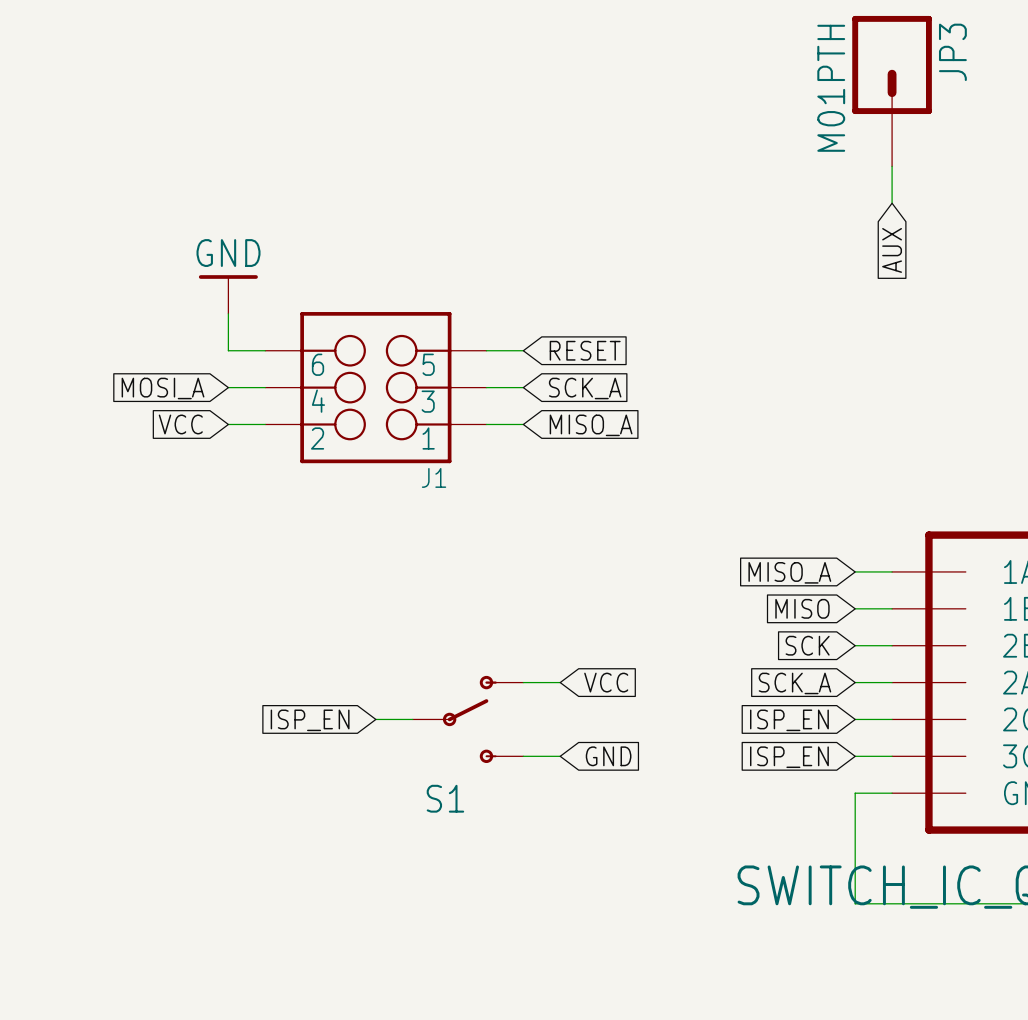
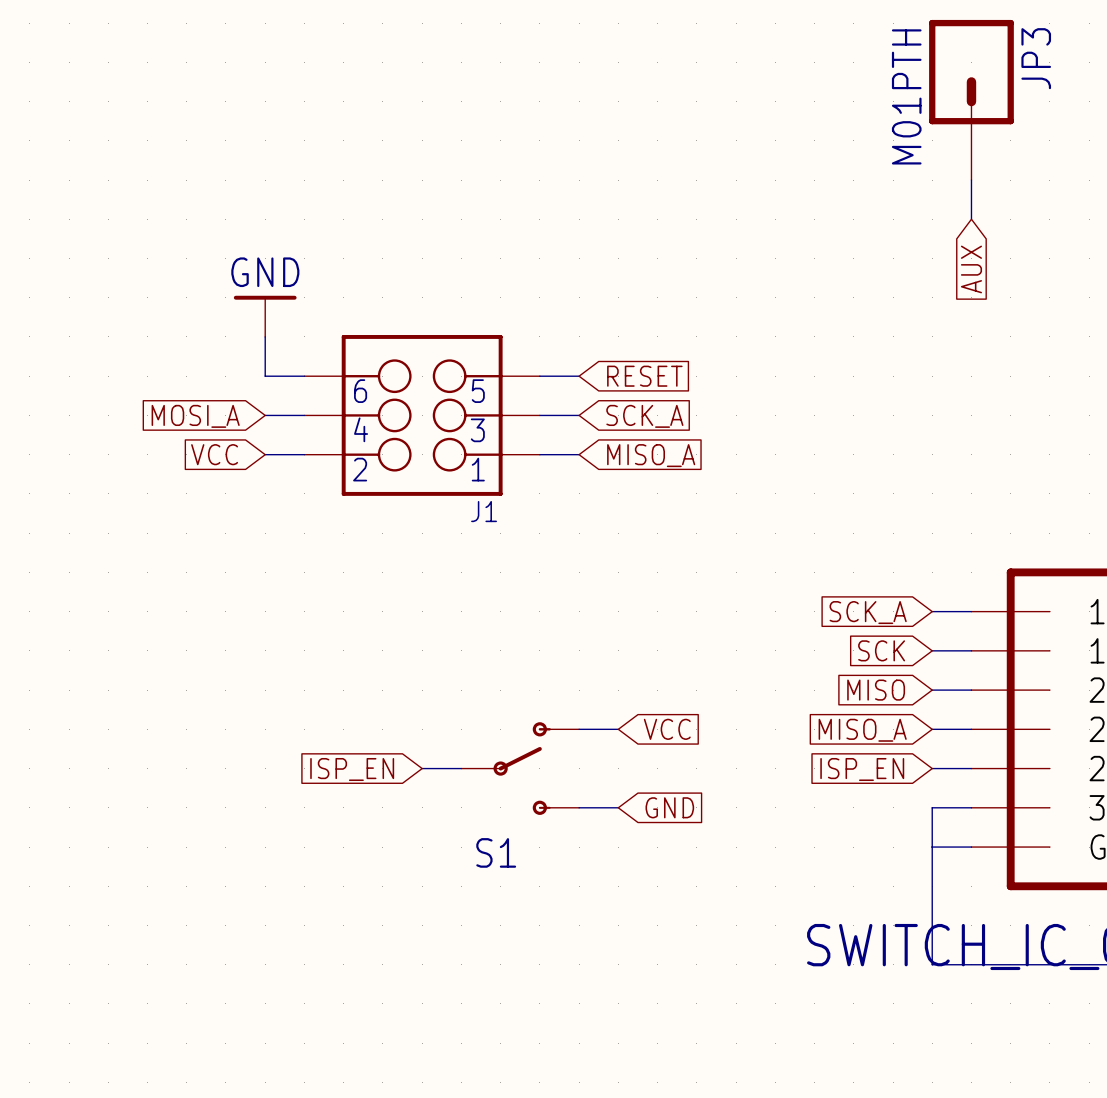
global label: MISO_A (789, 572) -> SCK_A (868, 612)
global label: MISO (802, 608) -> SCK (881, 650)
global label: SCK (807, 645) -> MISO (876, 690)
global label: SCK_A (794, 683) -> MISO_A (862, 730)
wire: none -> (932, 807) (932, 847)
global label: ISP_EN (789, 757) -> none

